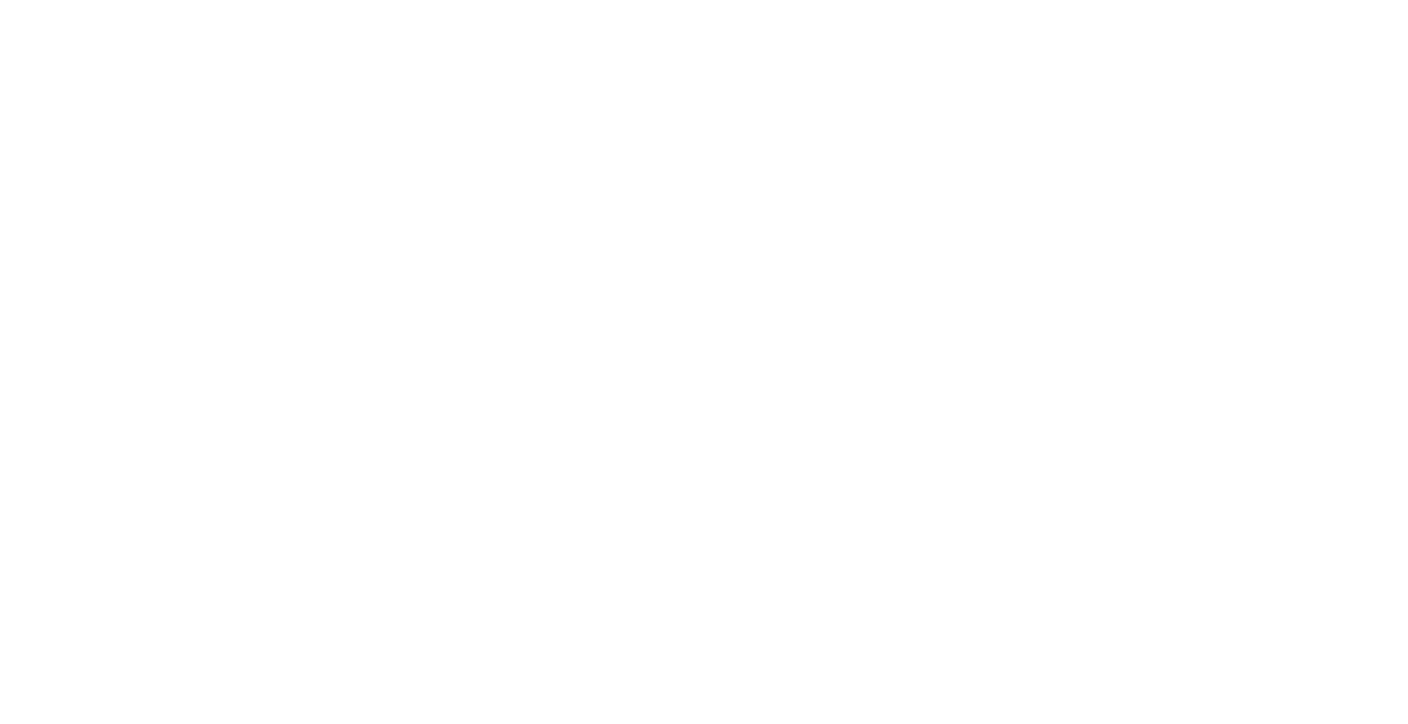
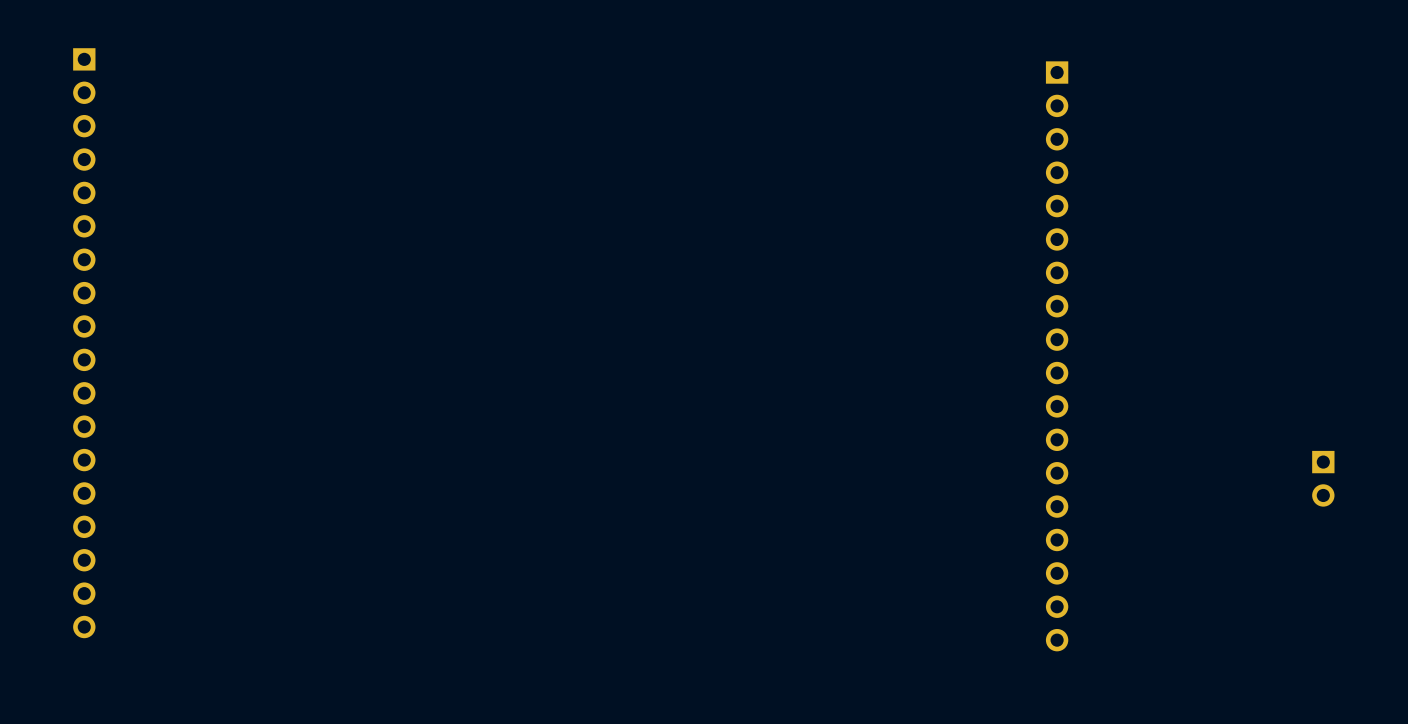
part: none -> (84, 343)
part: none -> (1057, 356)
part: none -> (1323, 478)

